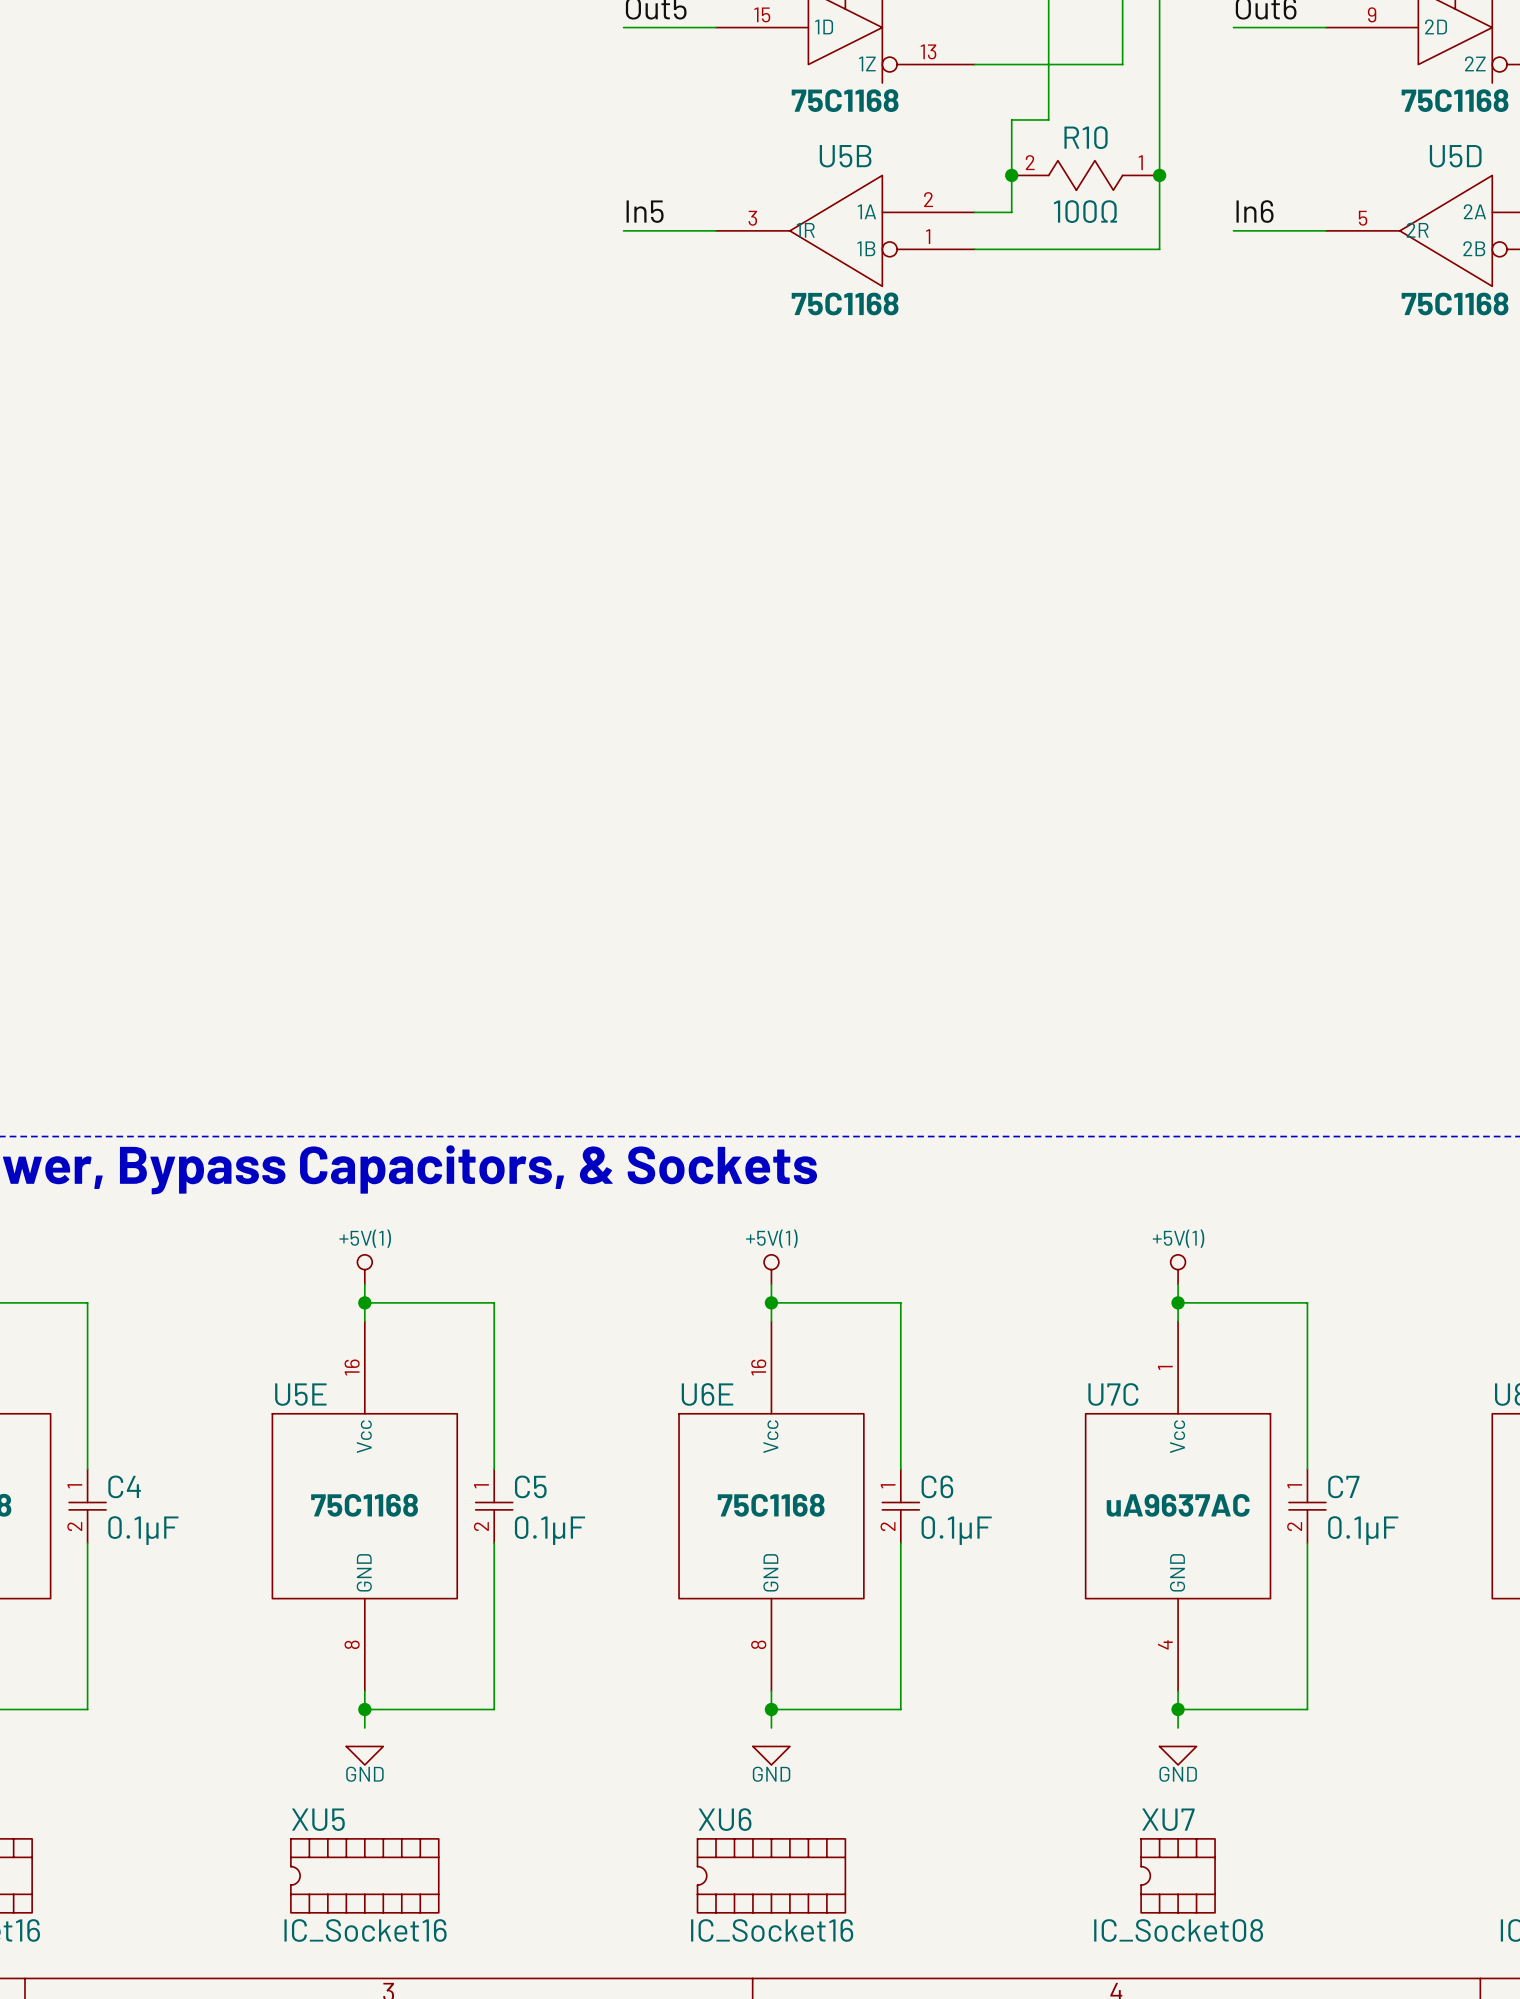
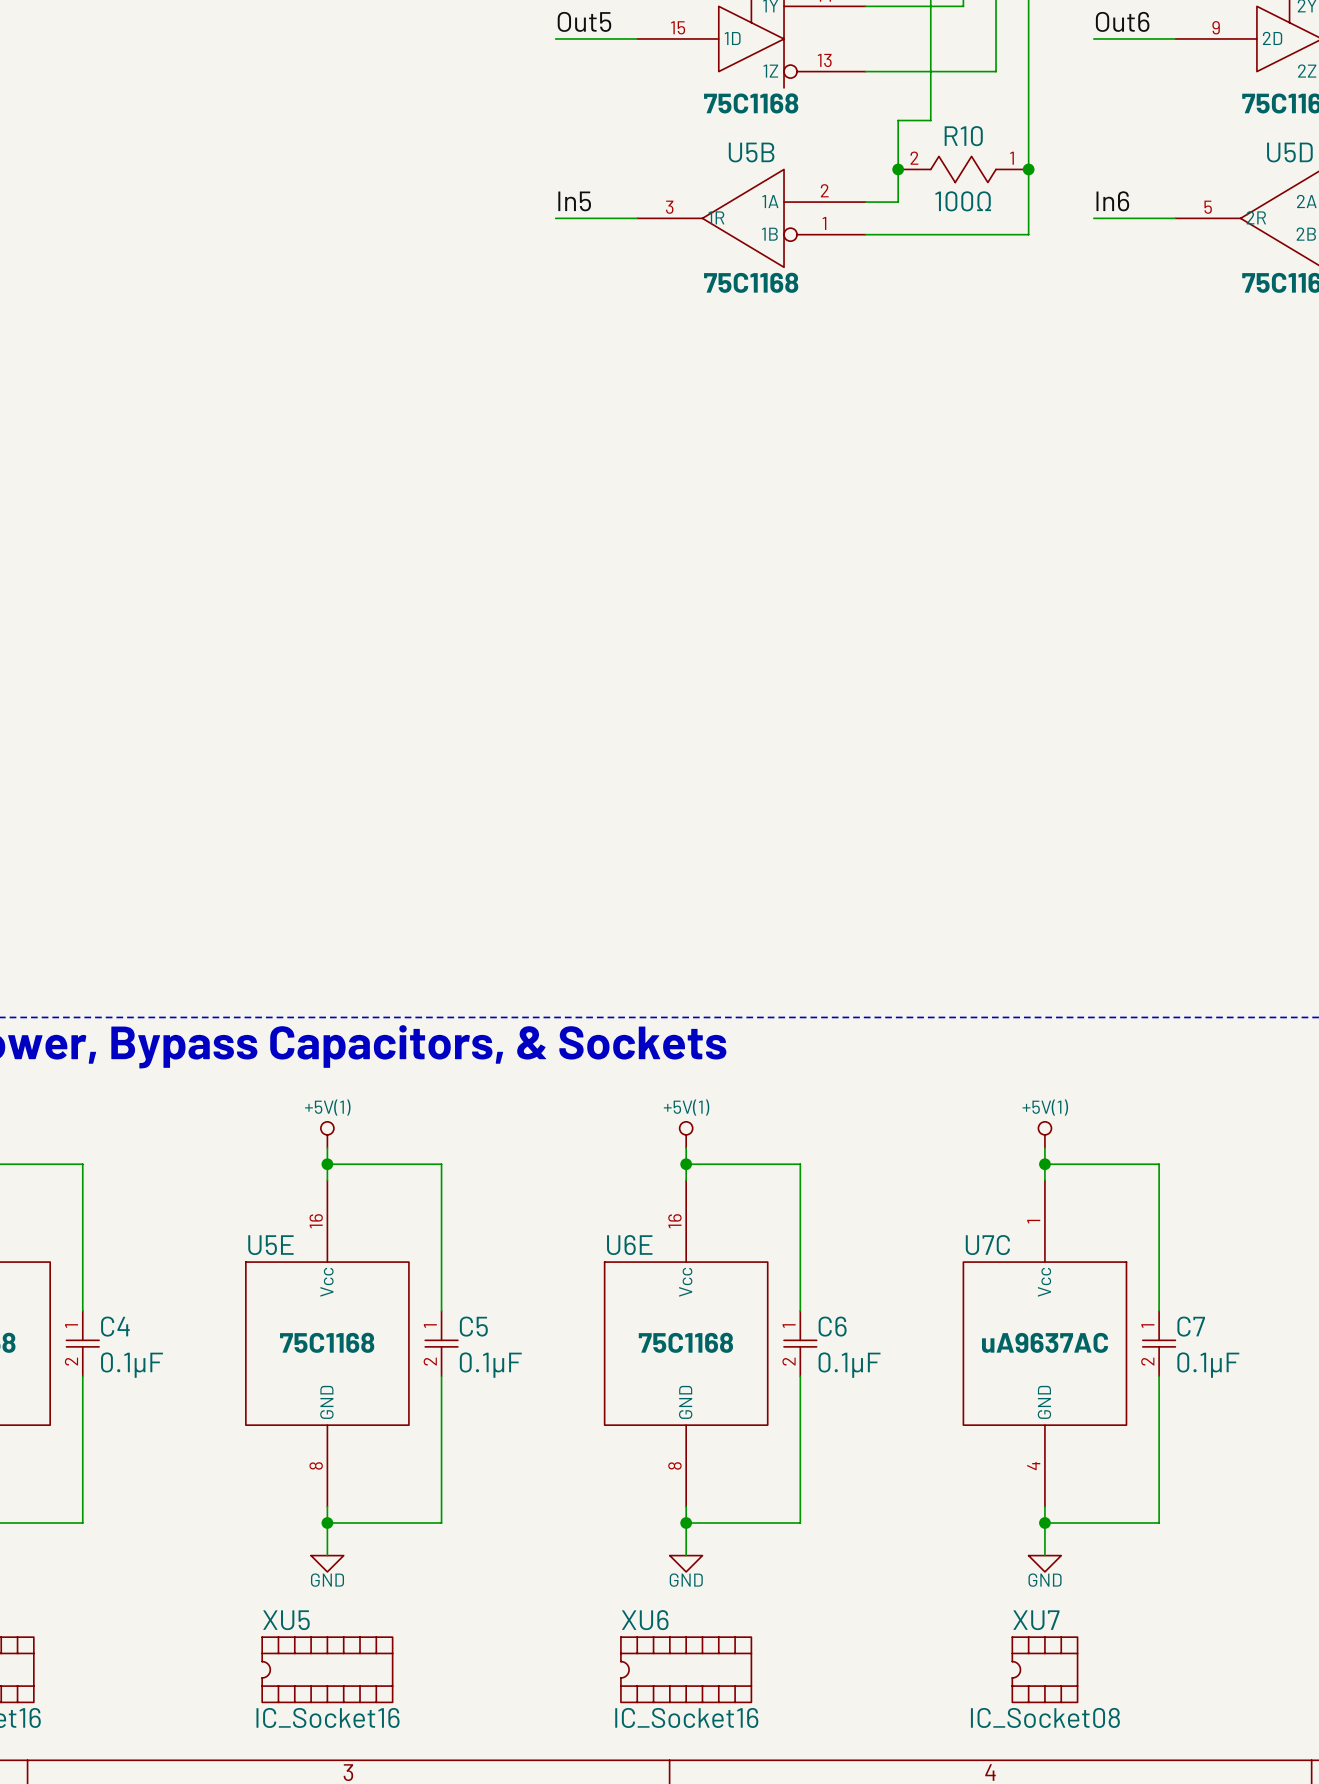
wire: none -> (327, 1539) (327, 1555)
wire: none -> (686, 1539) (686, 1555)
wire: none -> (1044, 1539) (1044, 1555)

